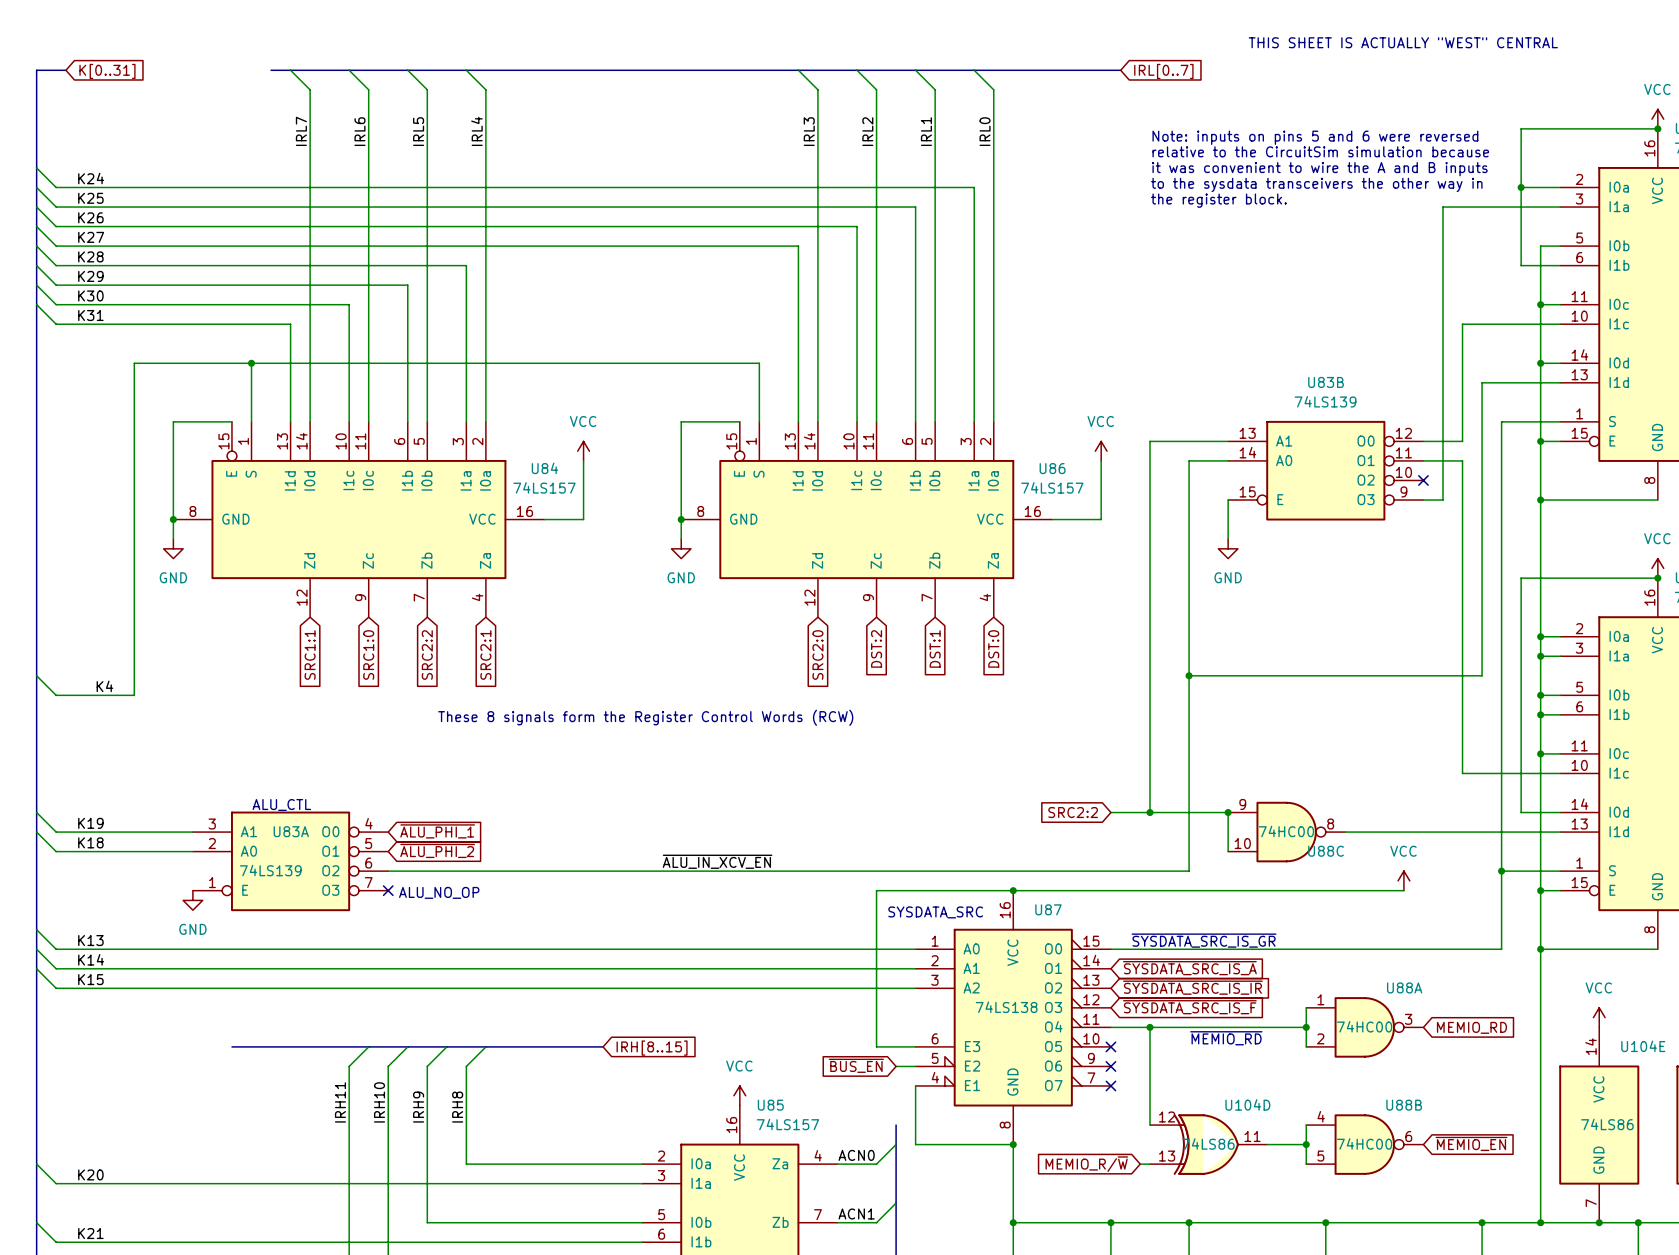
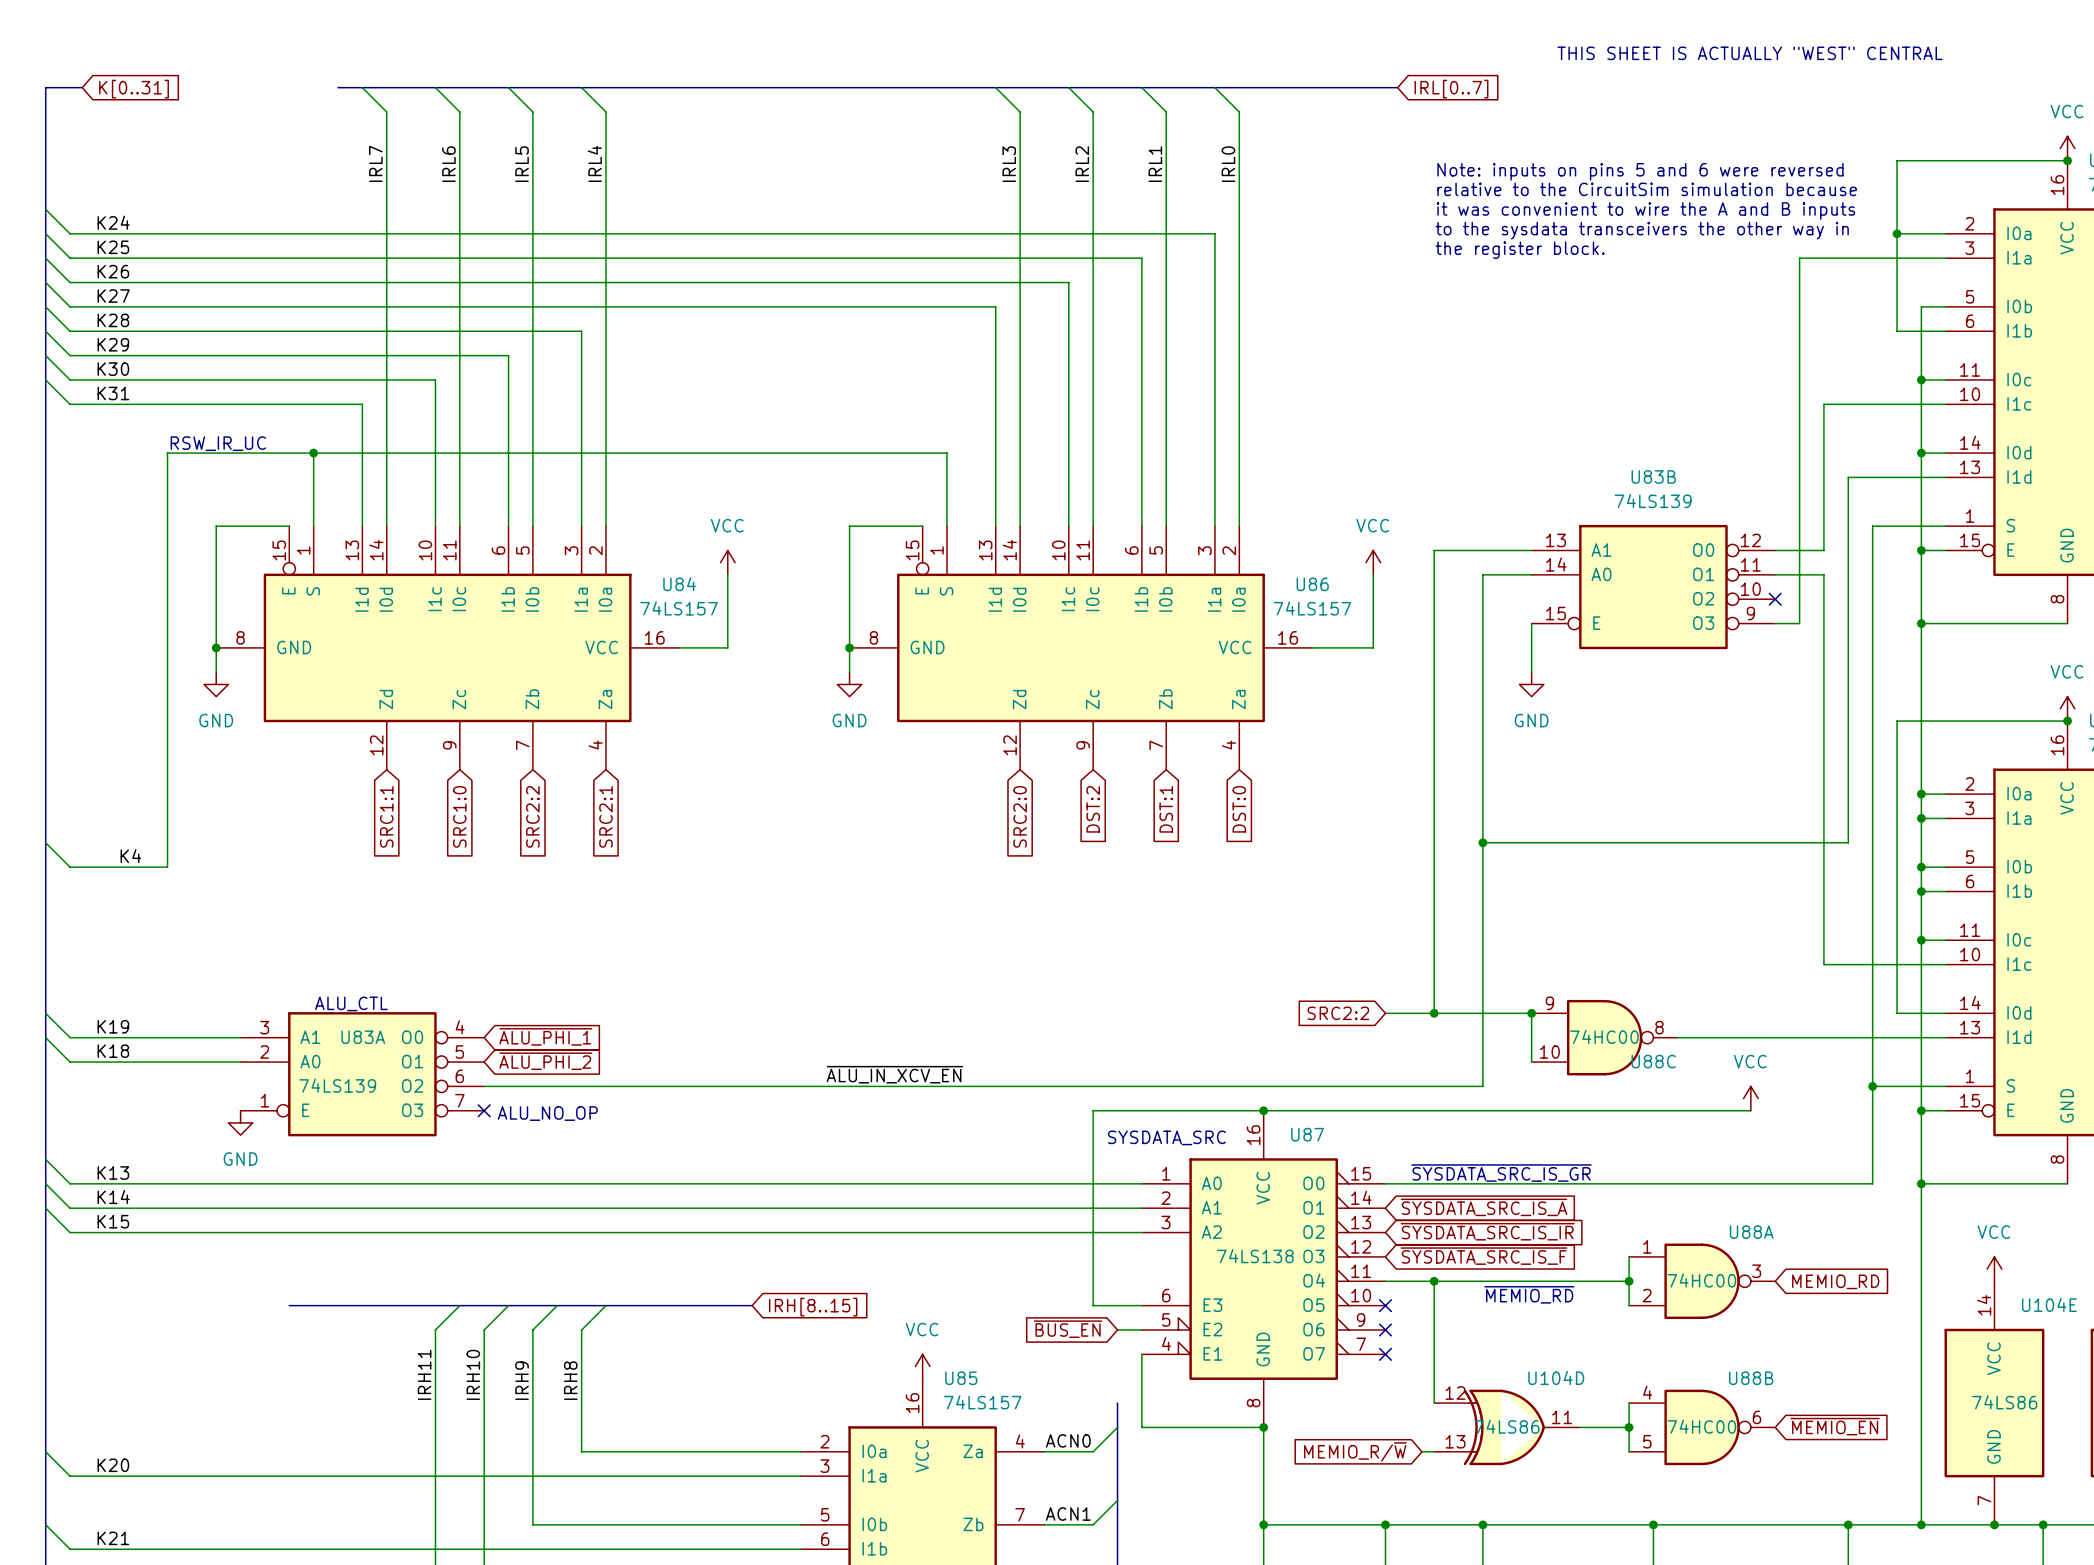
text: none -> RSW_IR_UC (218, 443)
text: These 8 signals form the Register Control Words (RCW) (645, 717) -> none

